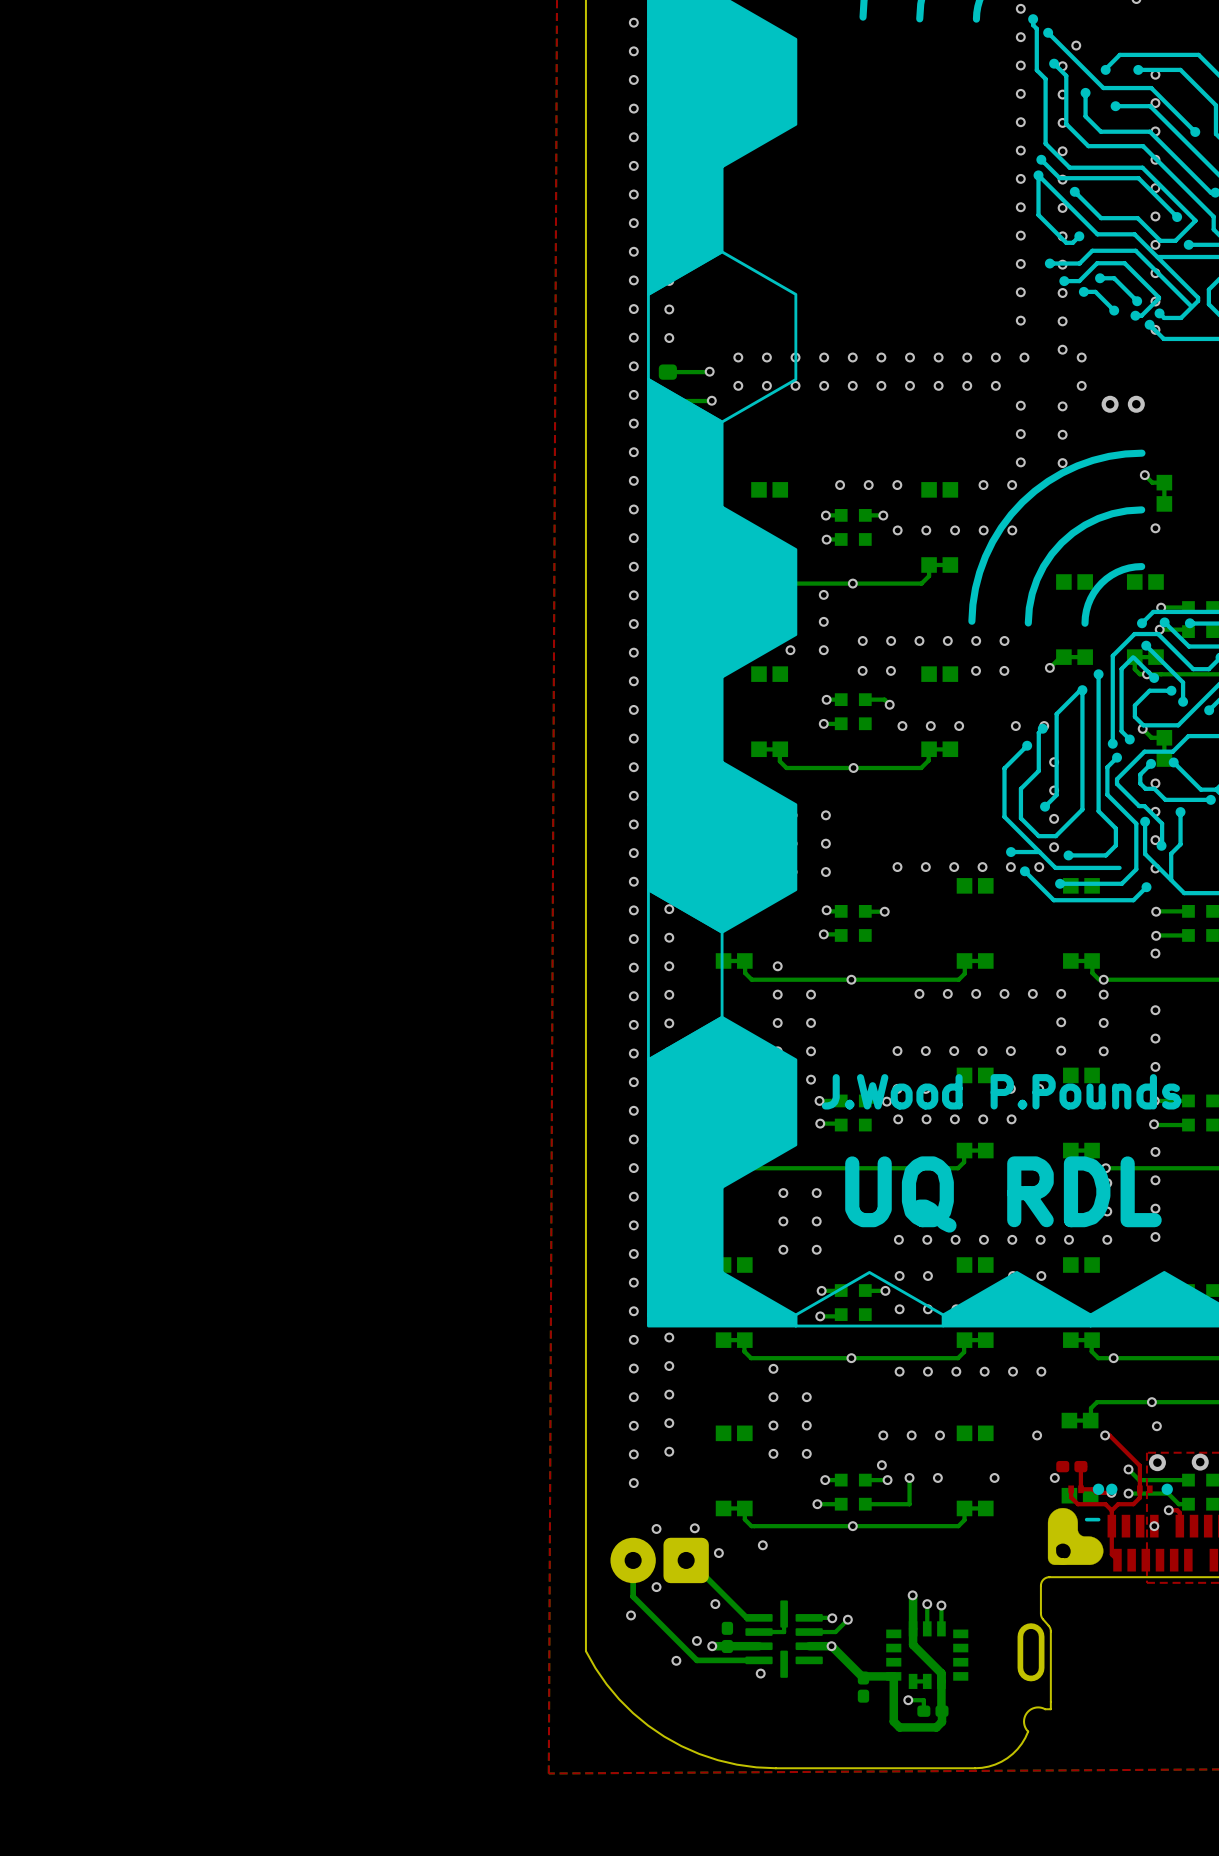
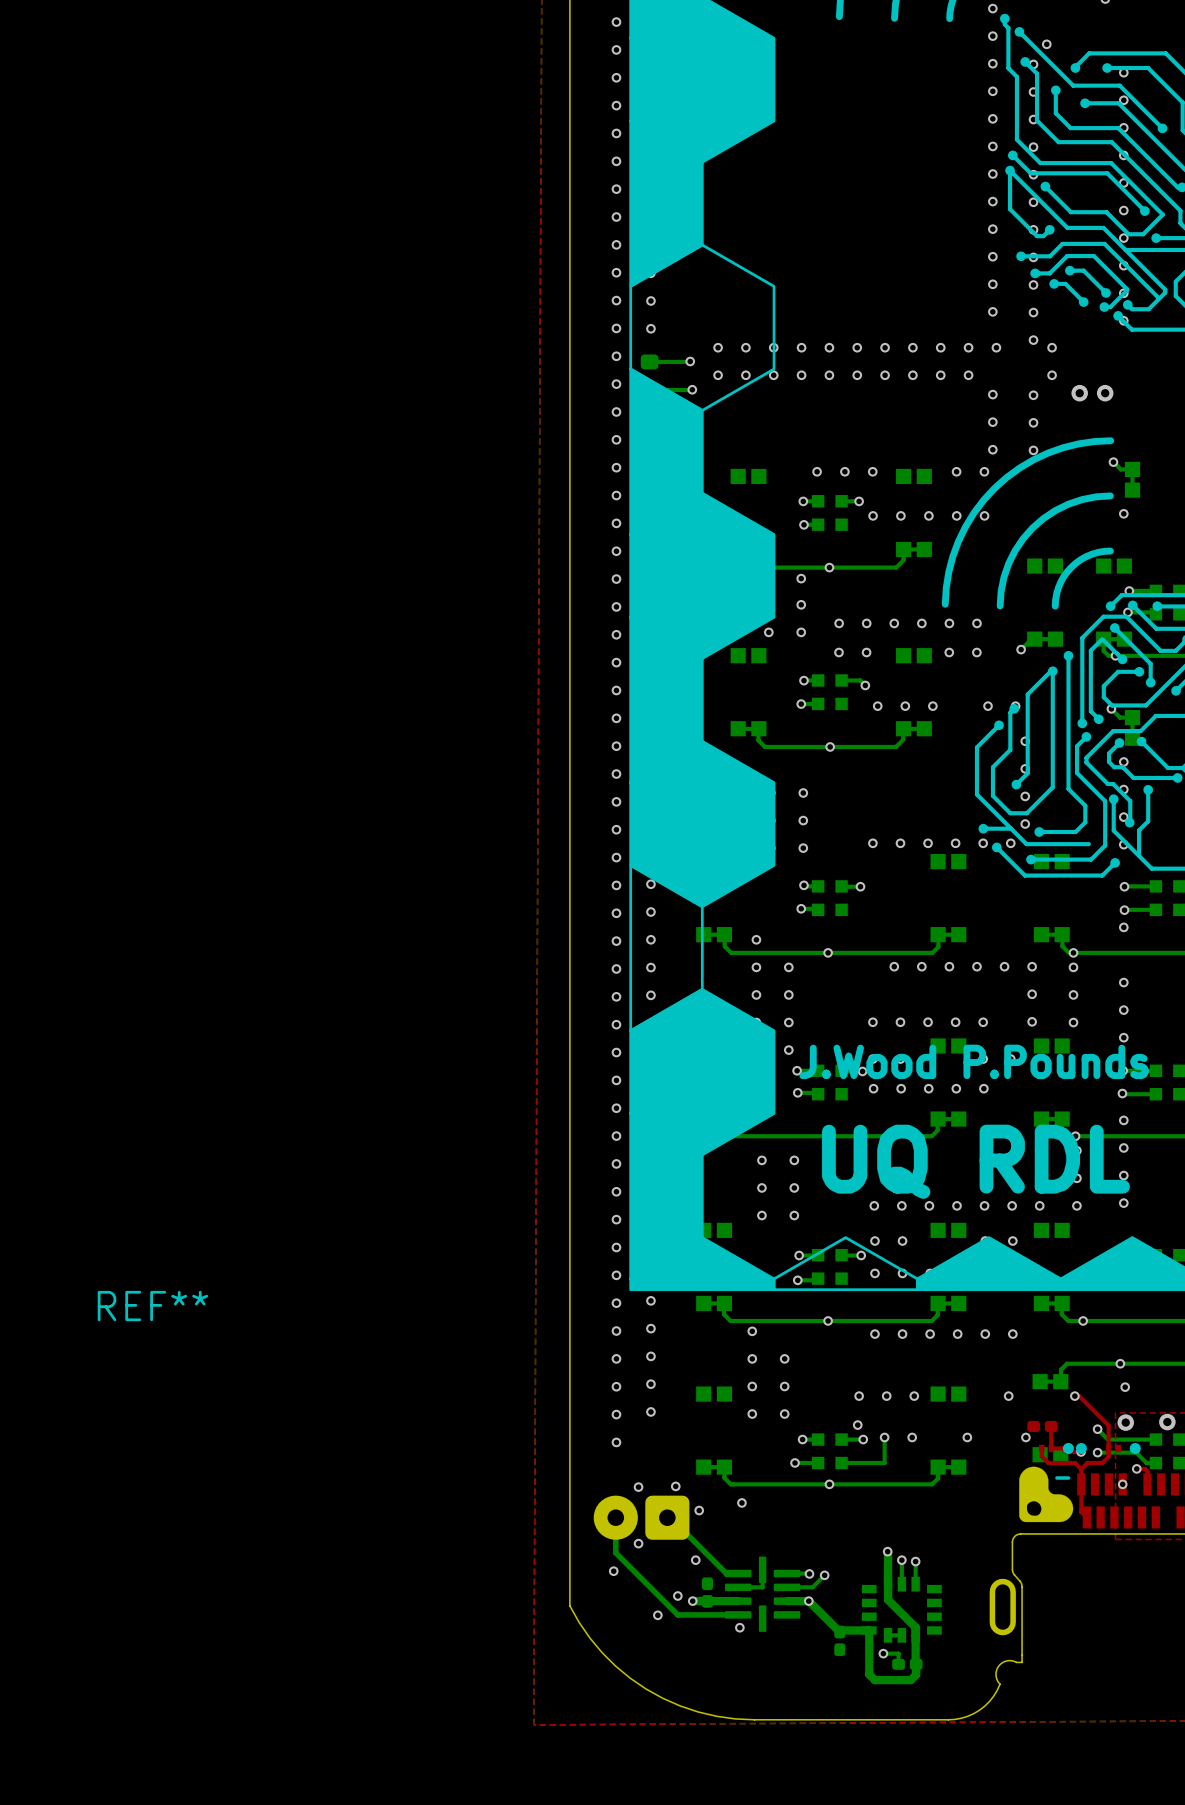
REF**: none -> (152, 1306)

